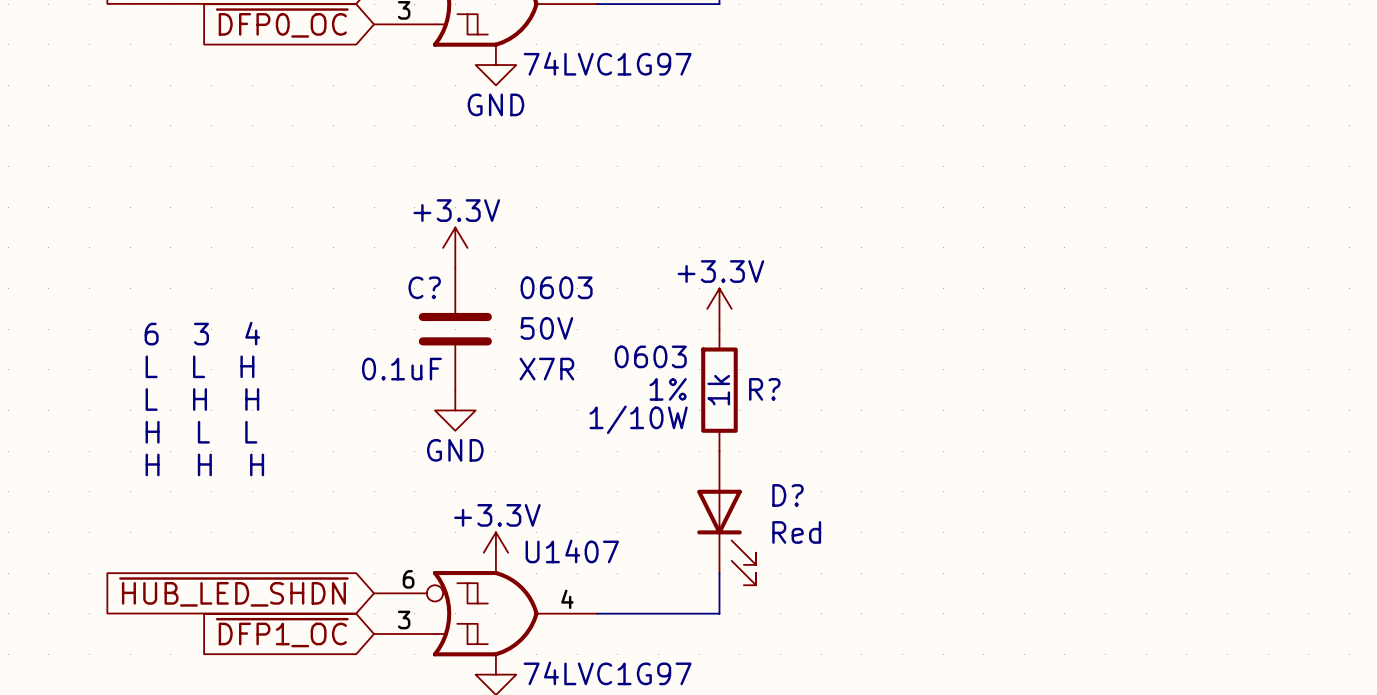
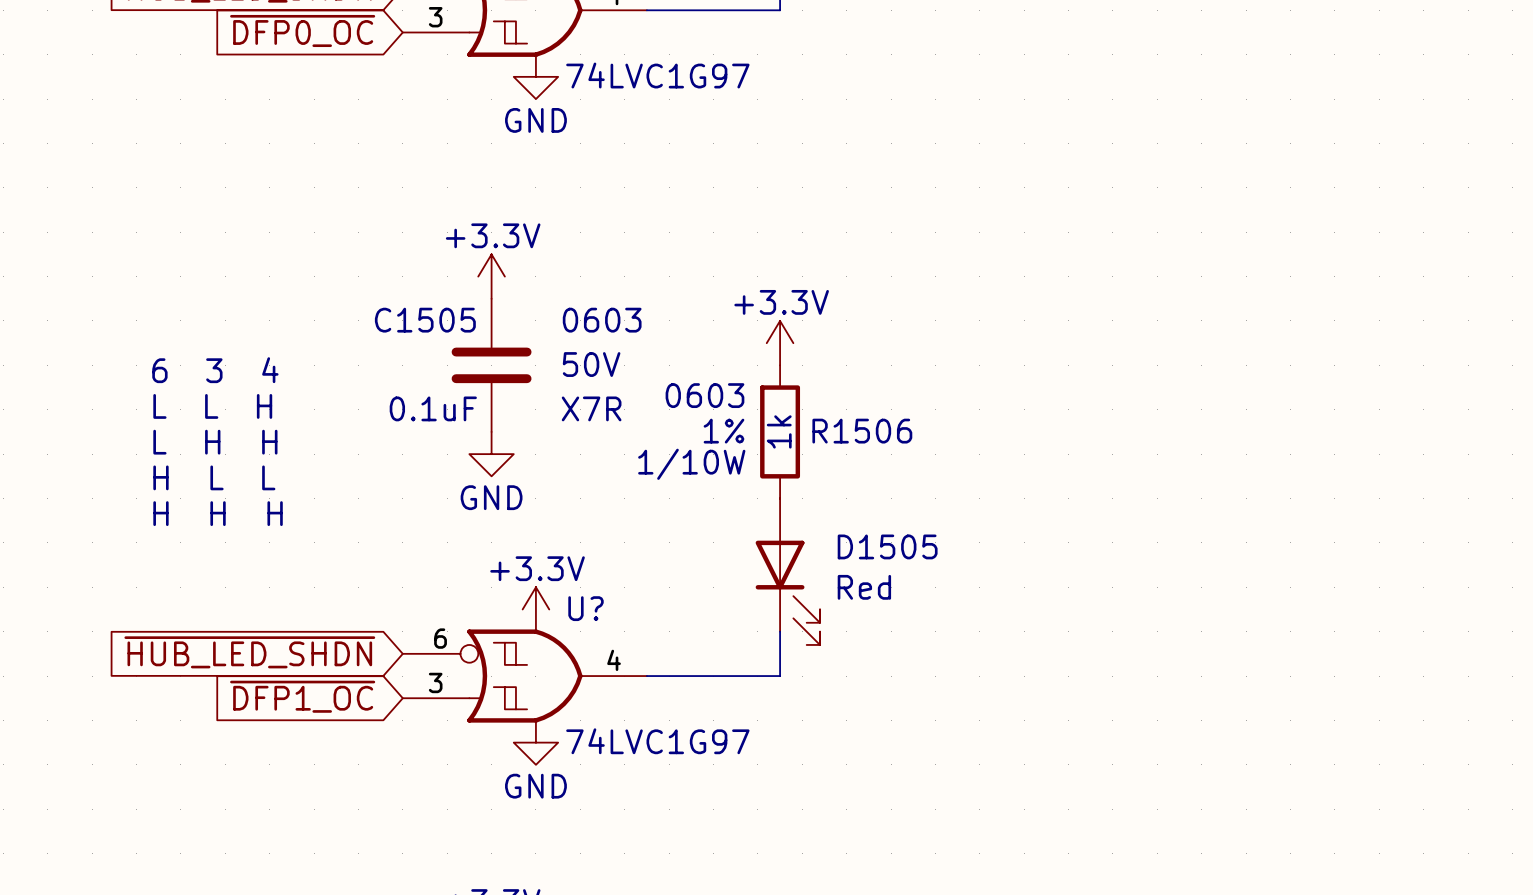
C? name: C? (424, 287) -> C1505 (425, 320)
R? name: R? (764, 389) -> R1506 (862, 431)
D? name: D? (787, 495) -> D1505 (887, 546)
U1407 name: U1407 (572, 551) -> U? (586, 608)

